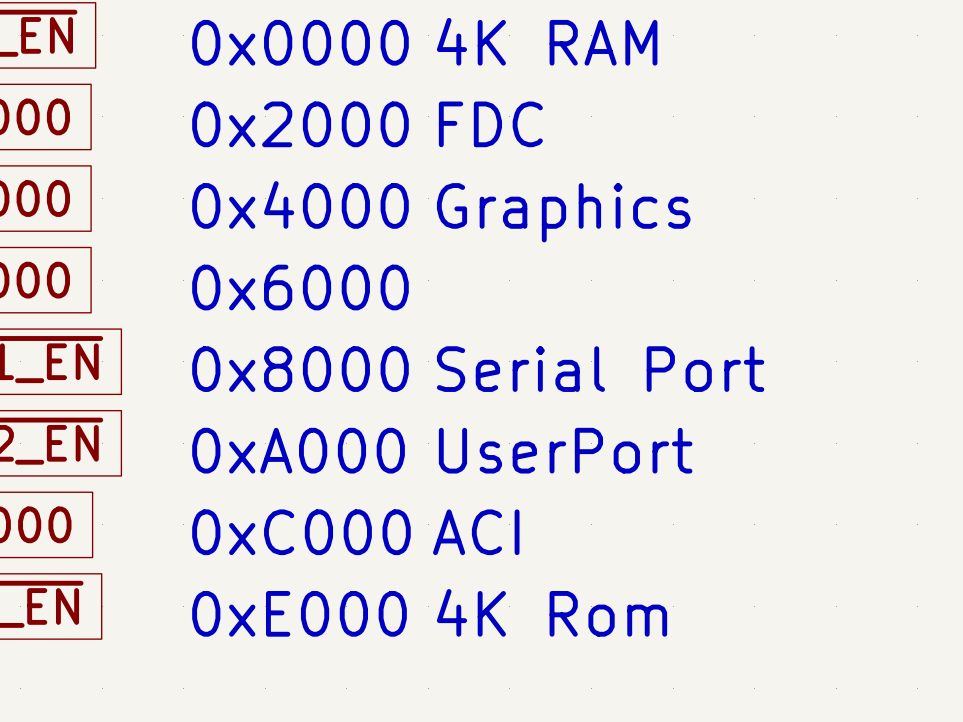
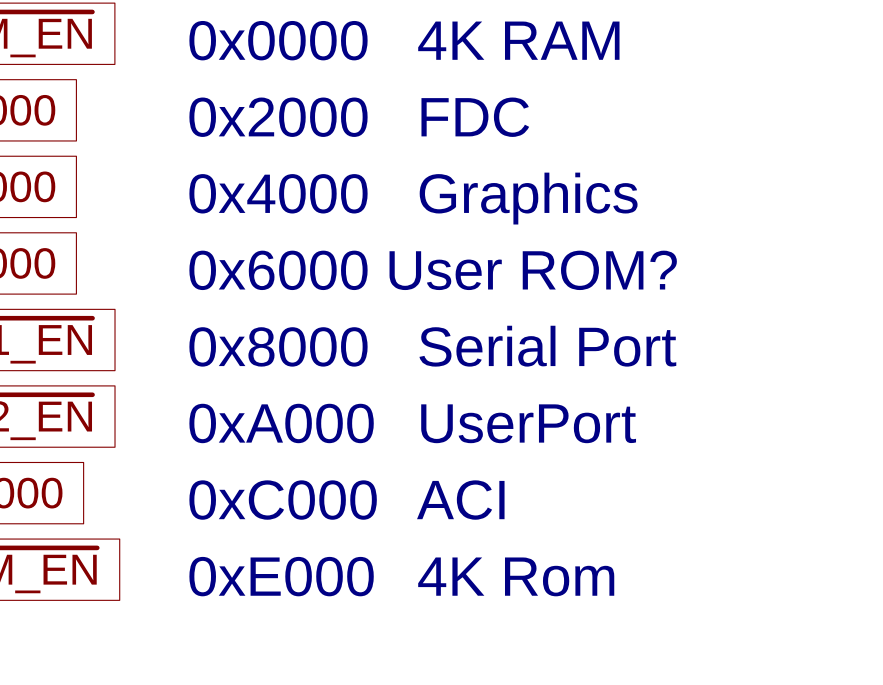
text: 0x6000 (300, 287) -> 0x6000 User ROM? (433, 270)

